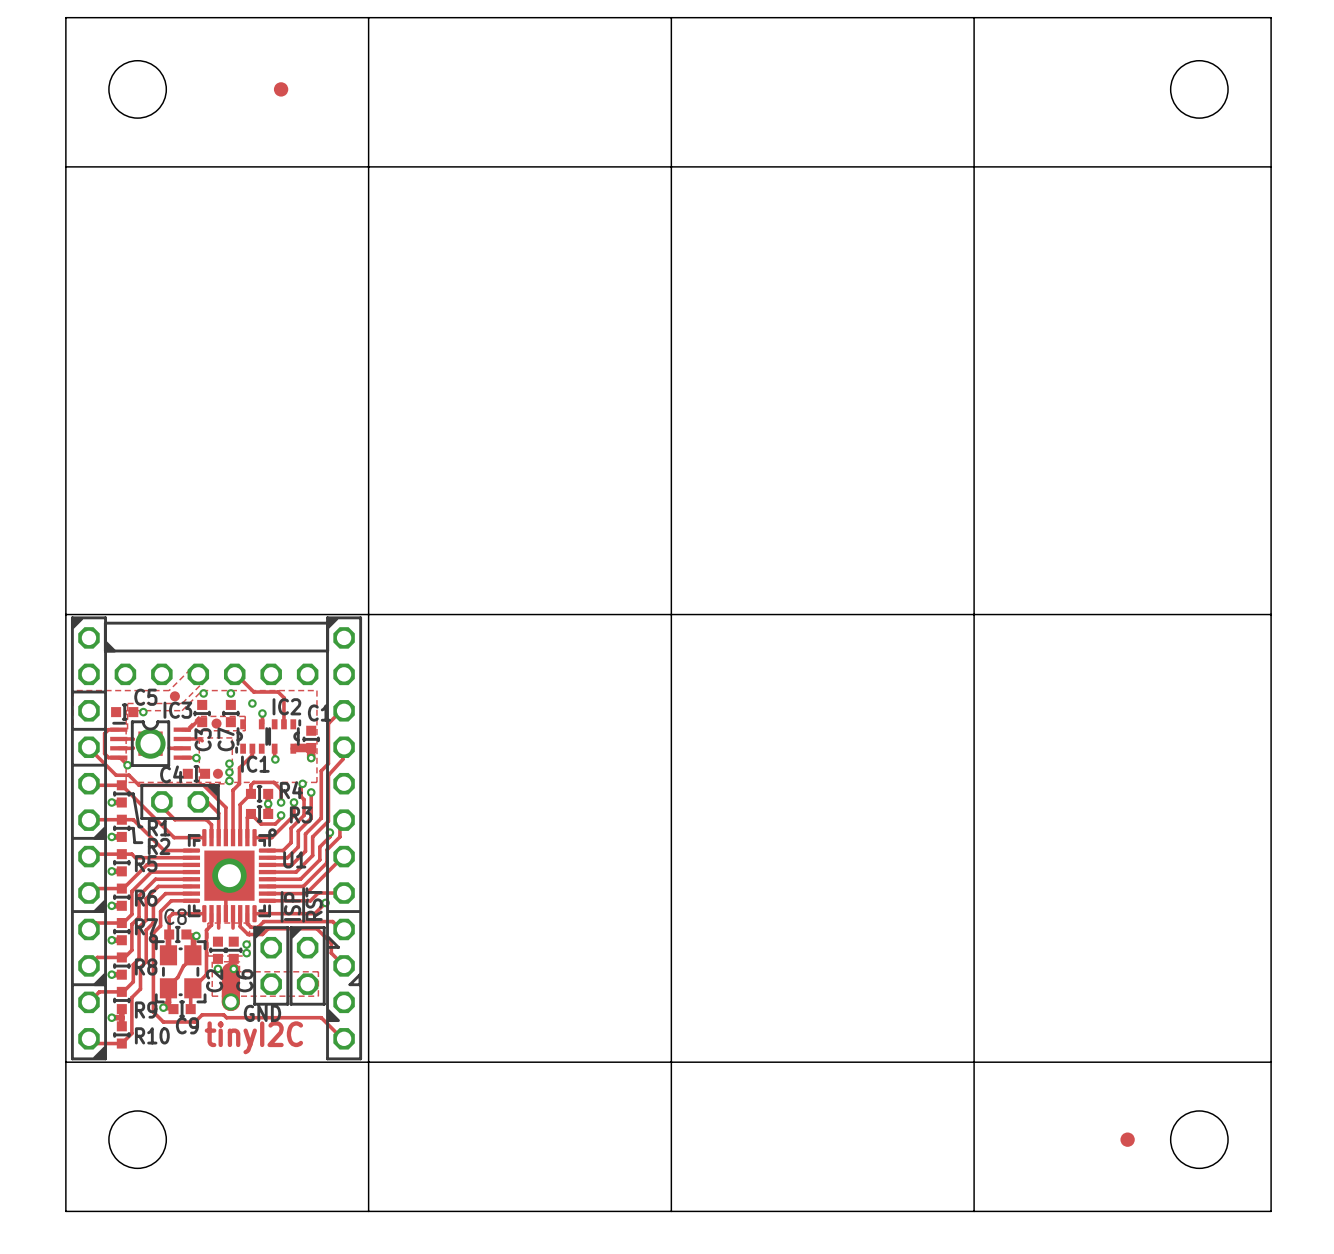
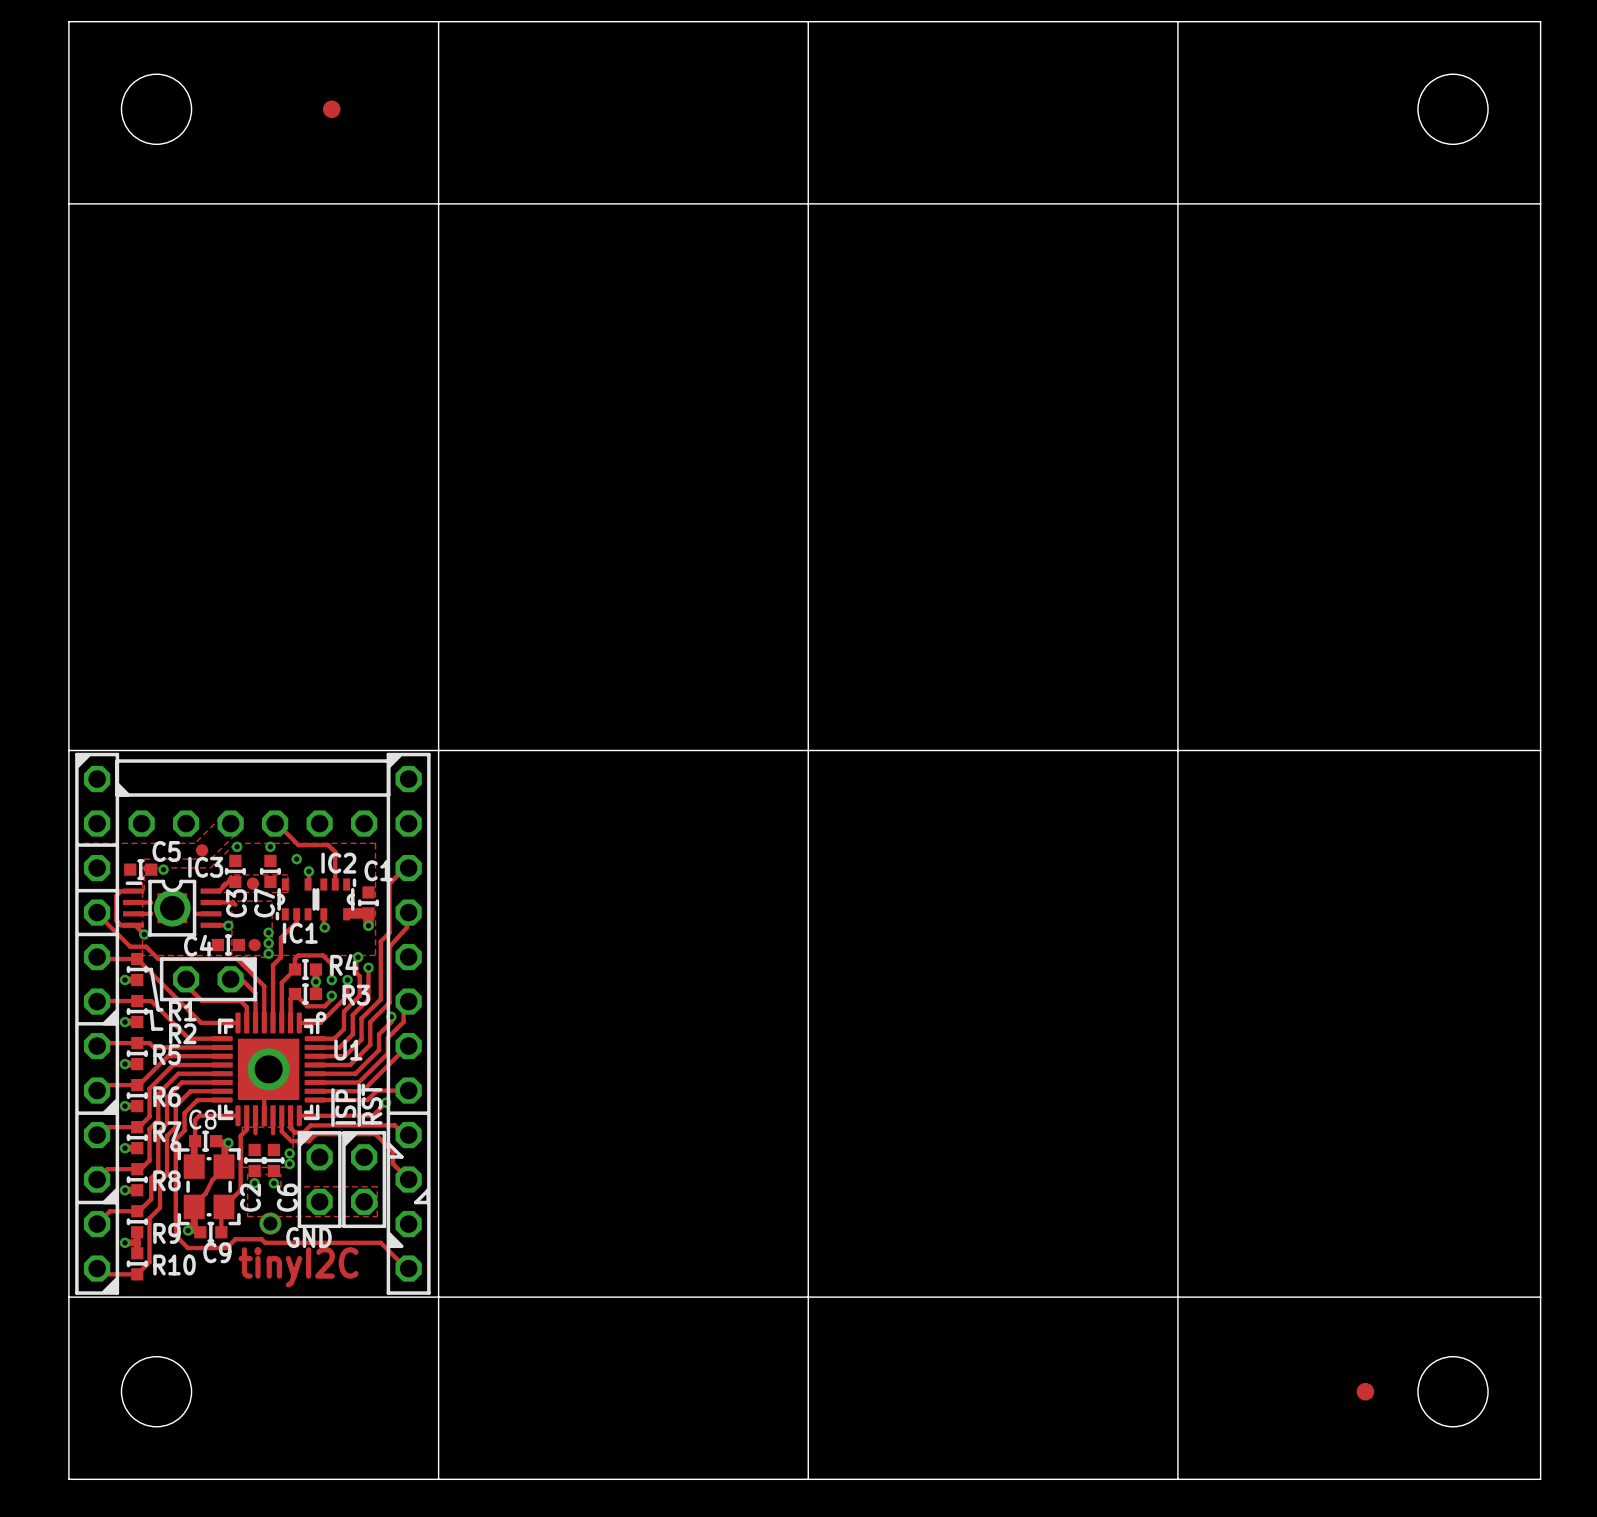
track: (233, 968) (230, 971) (230, 1001) -> none

